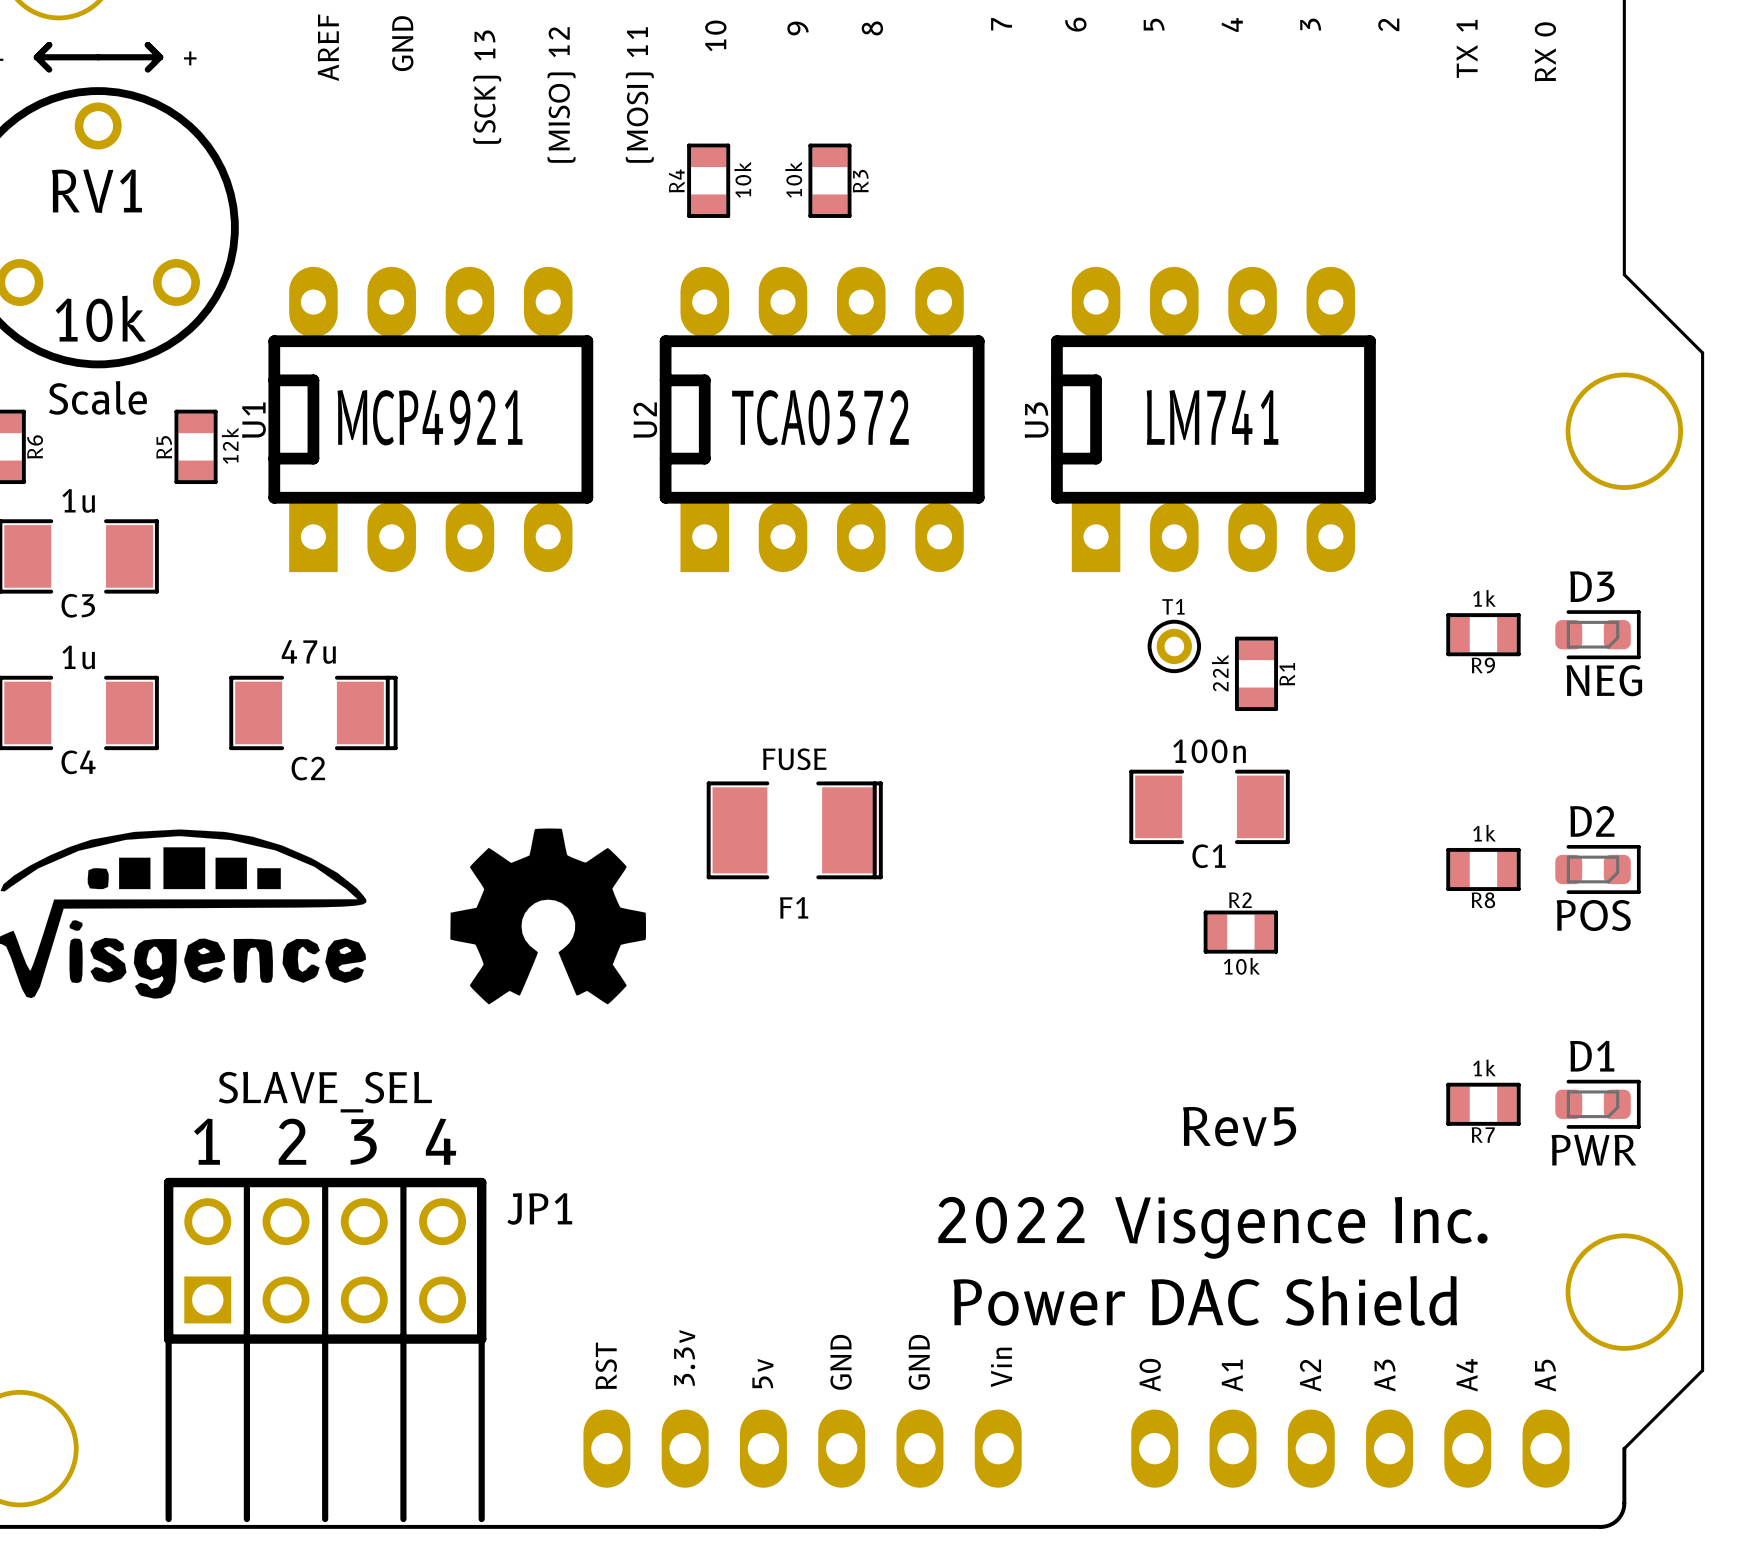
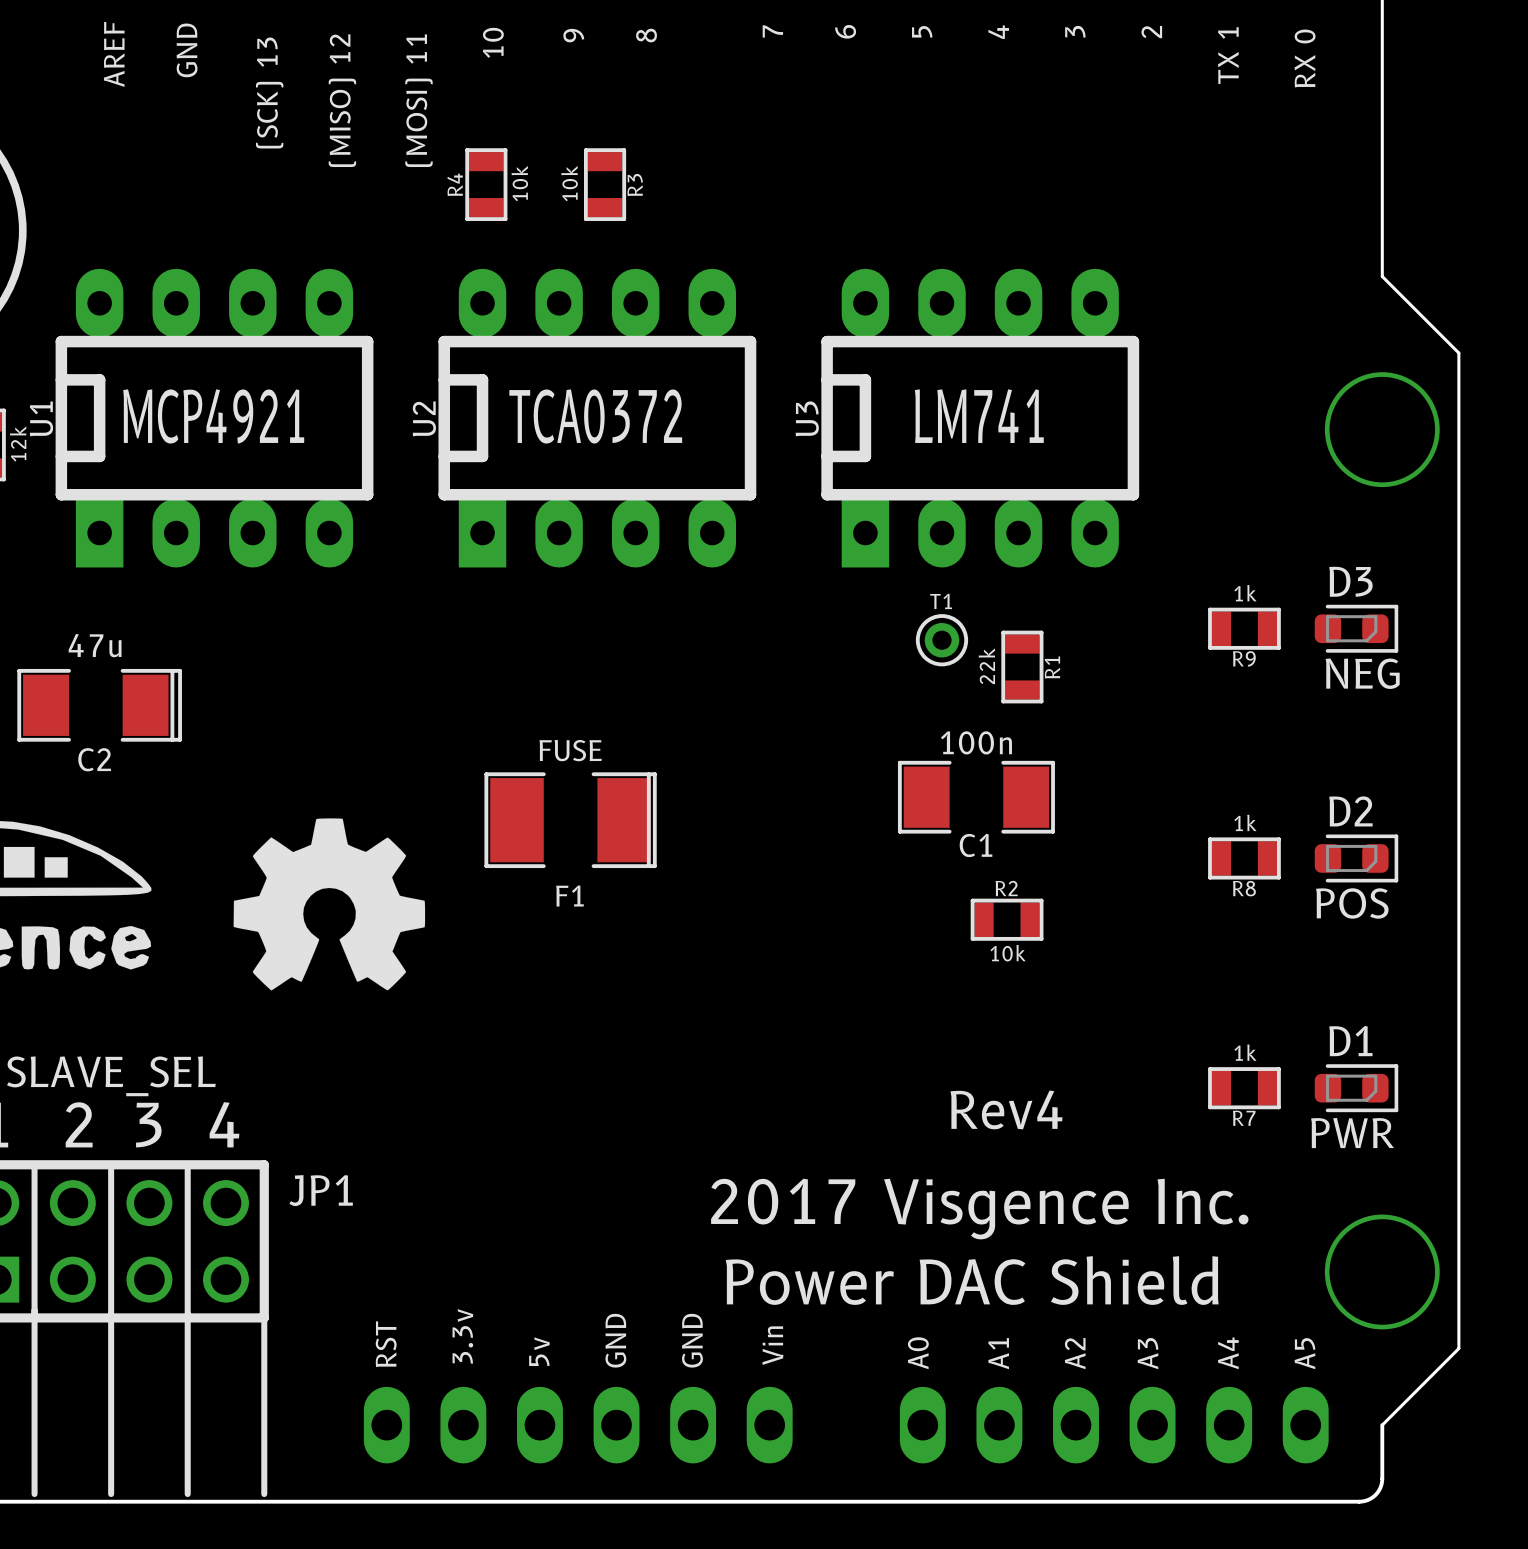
text: Rev5 (1239, 1126) -> Rev4 (1006, 1109)
text: 2022 Visgence Inc. (1212, 1227) -> 2017 Visgence Inc. (979, 1209)

